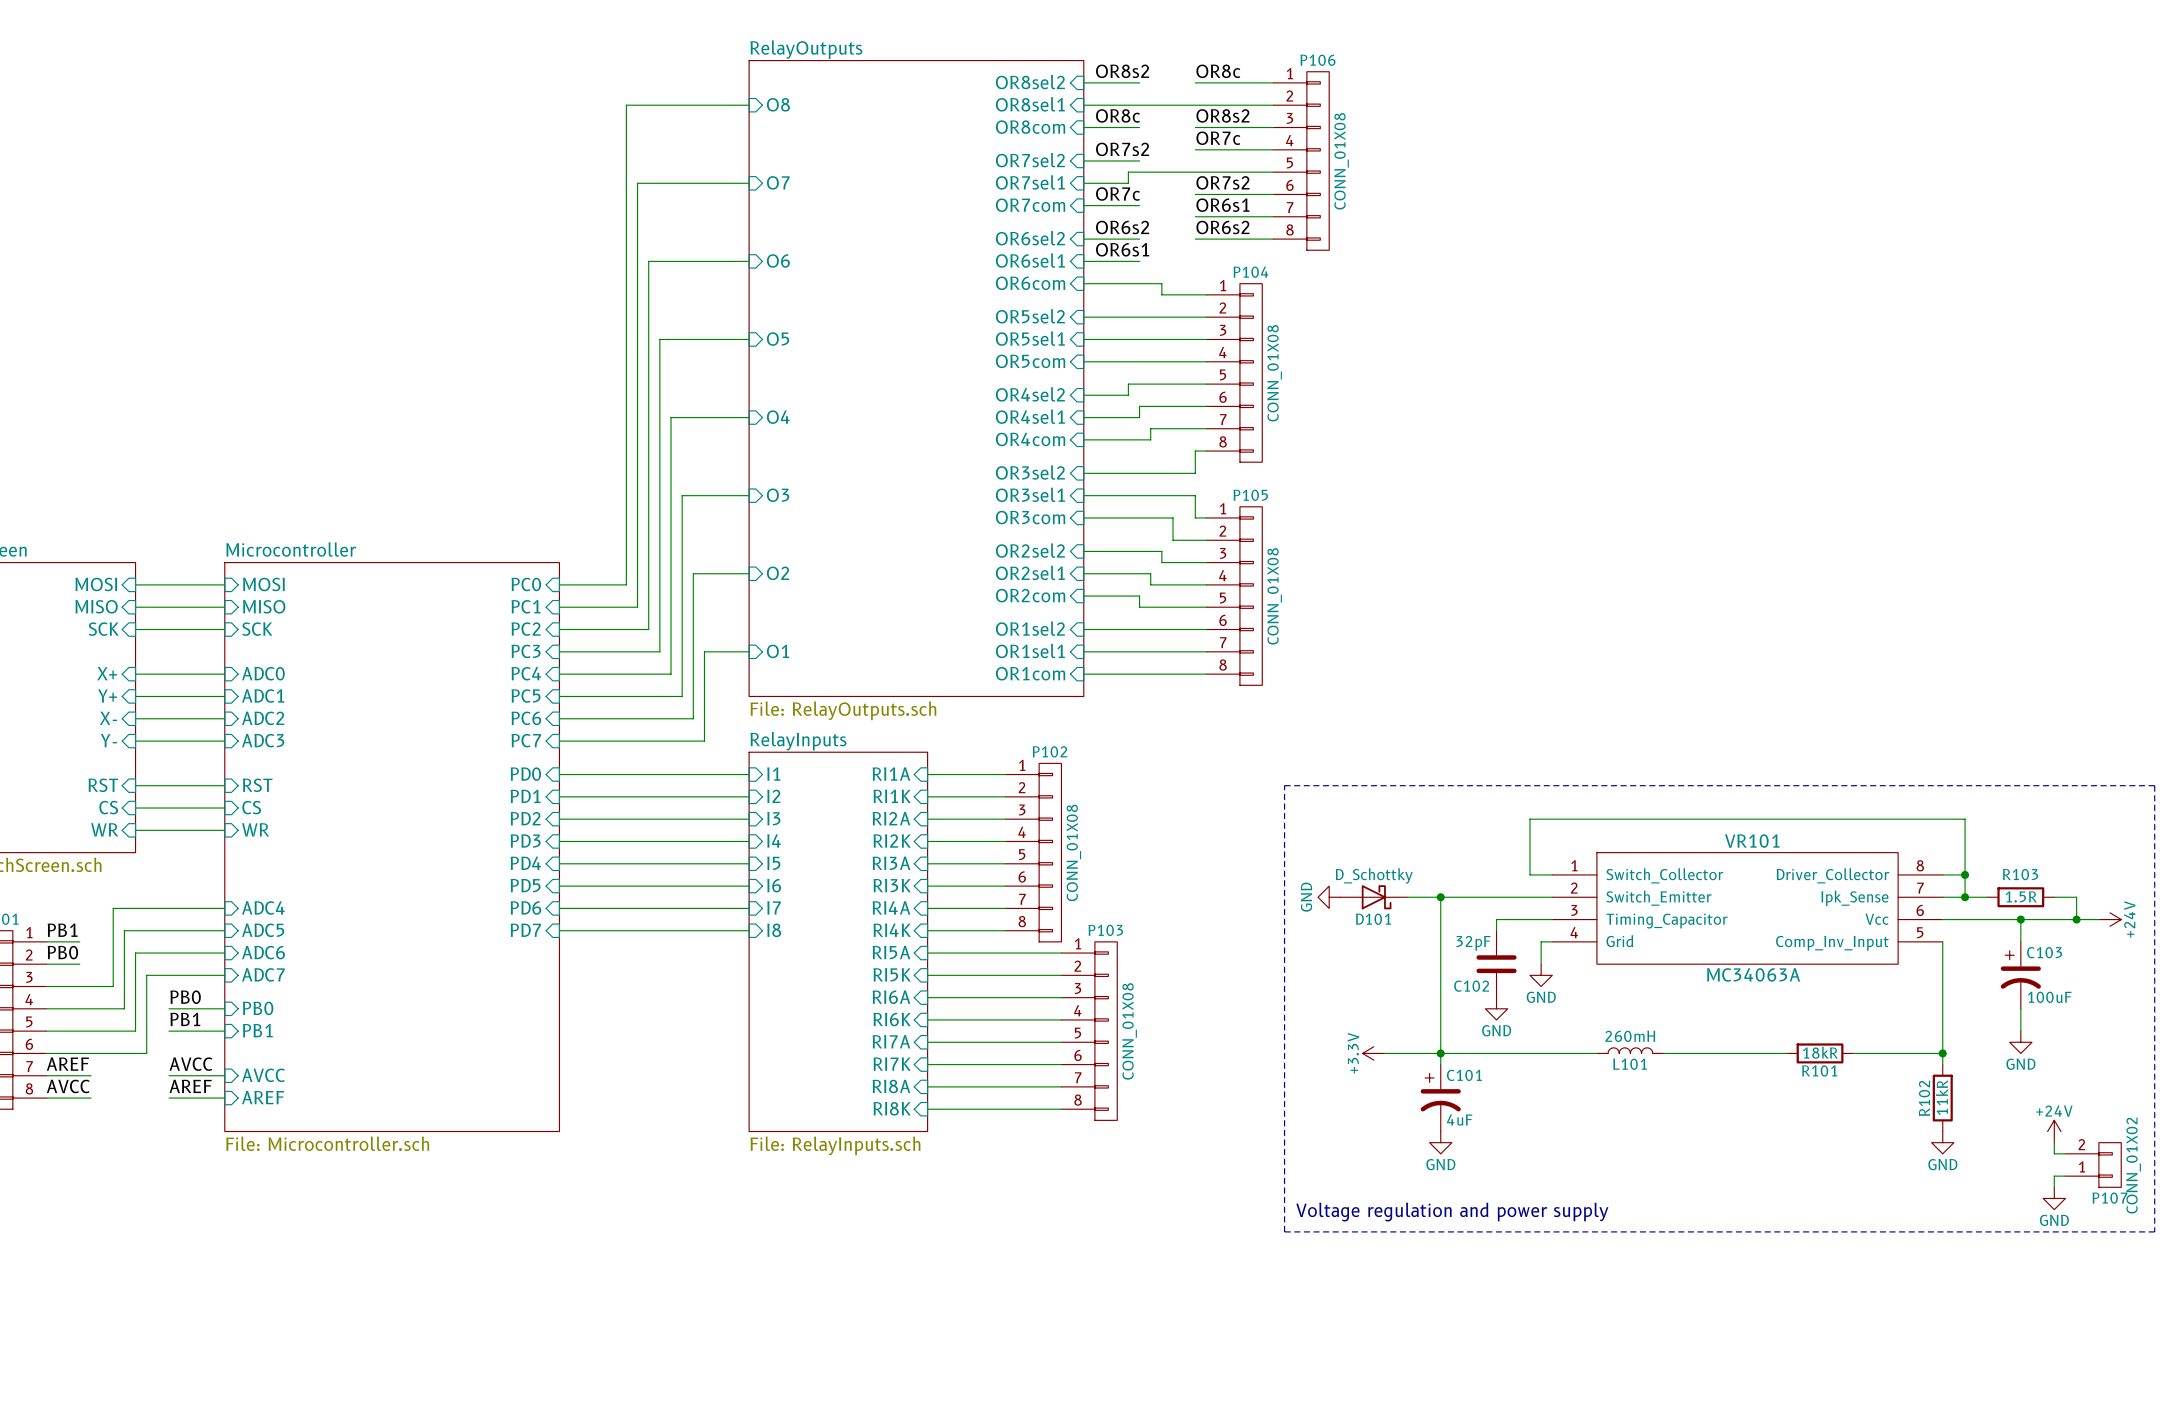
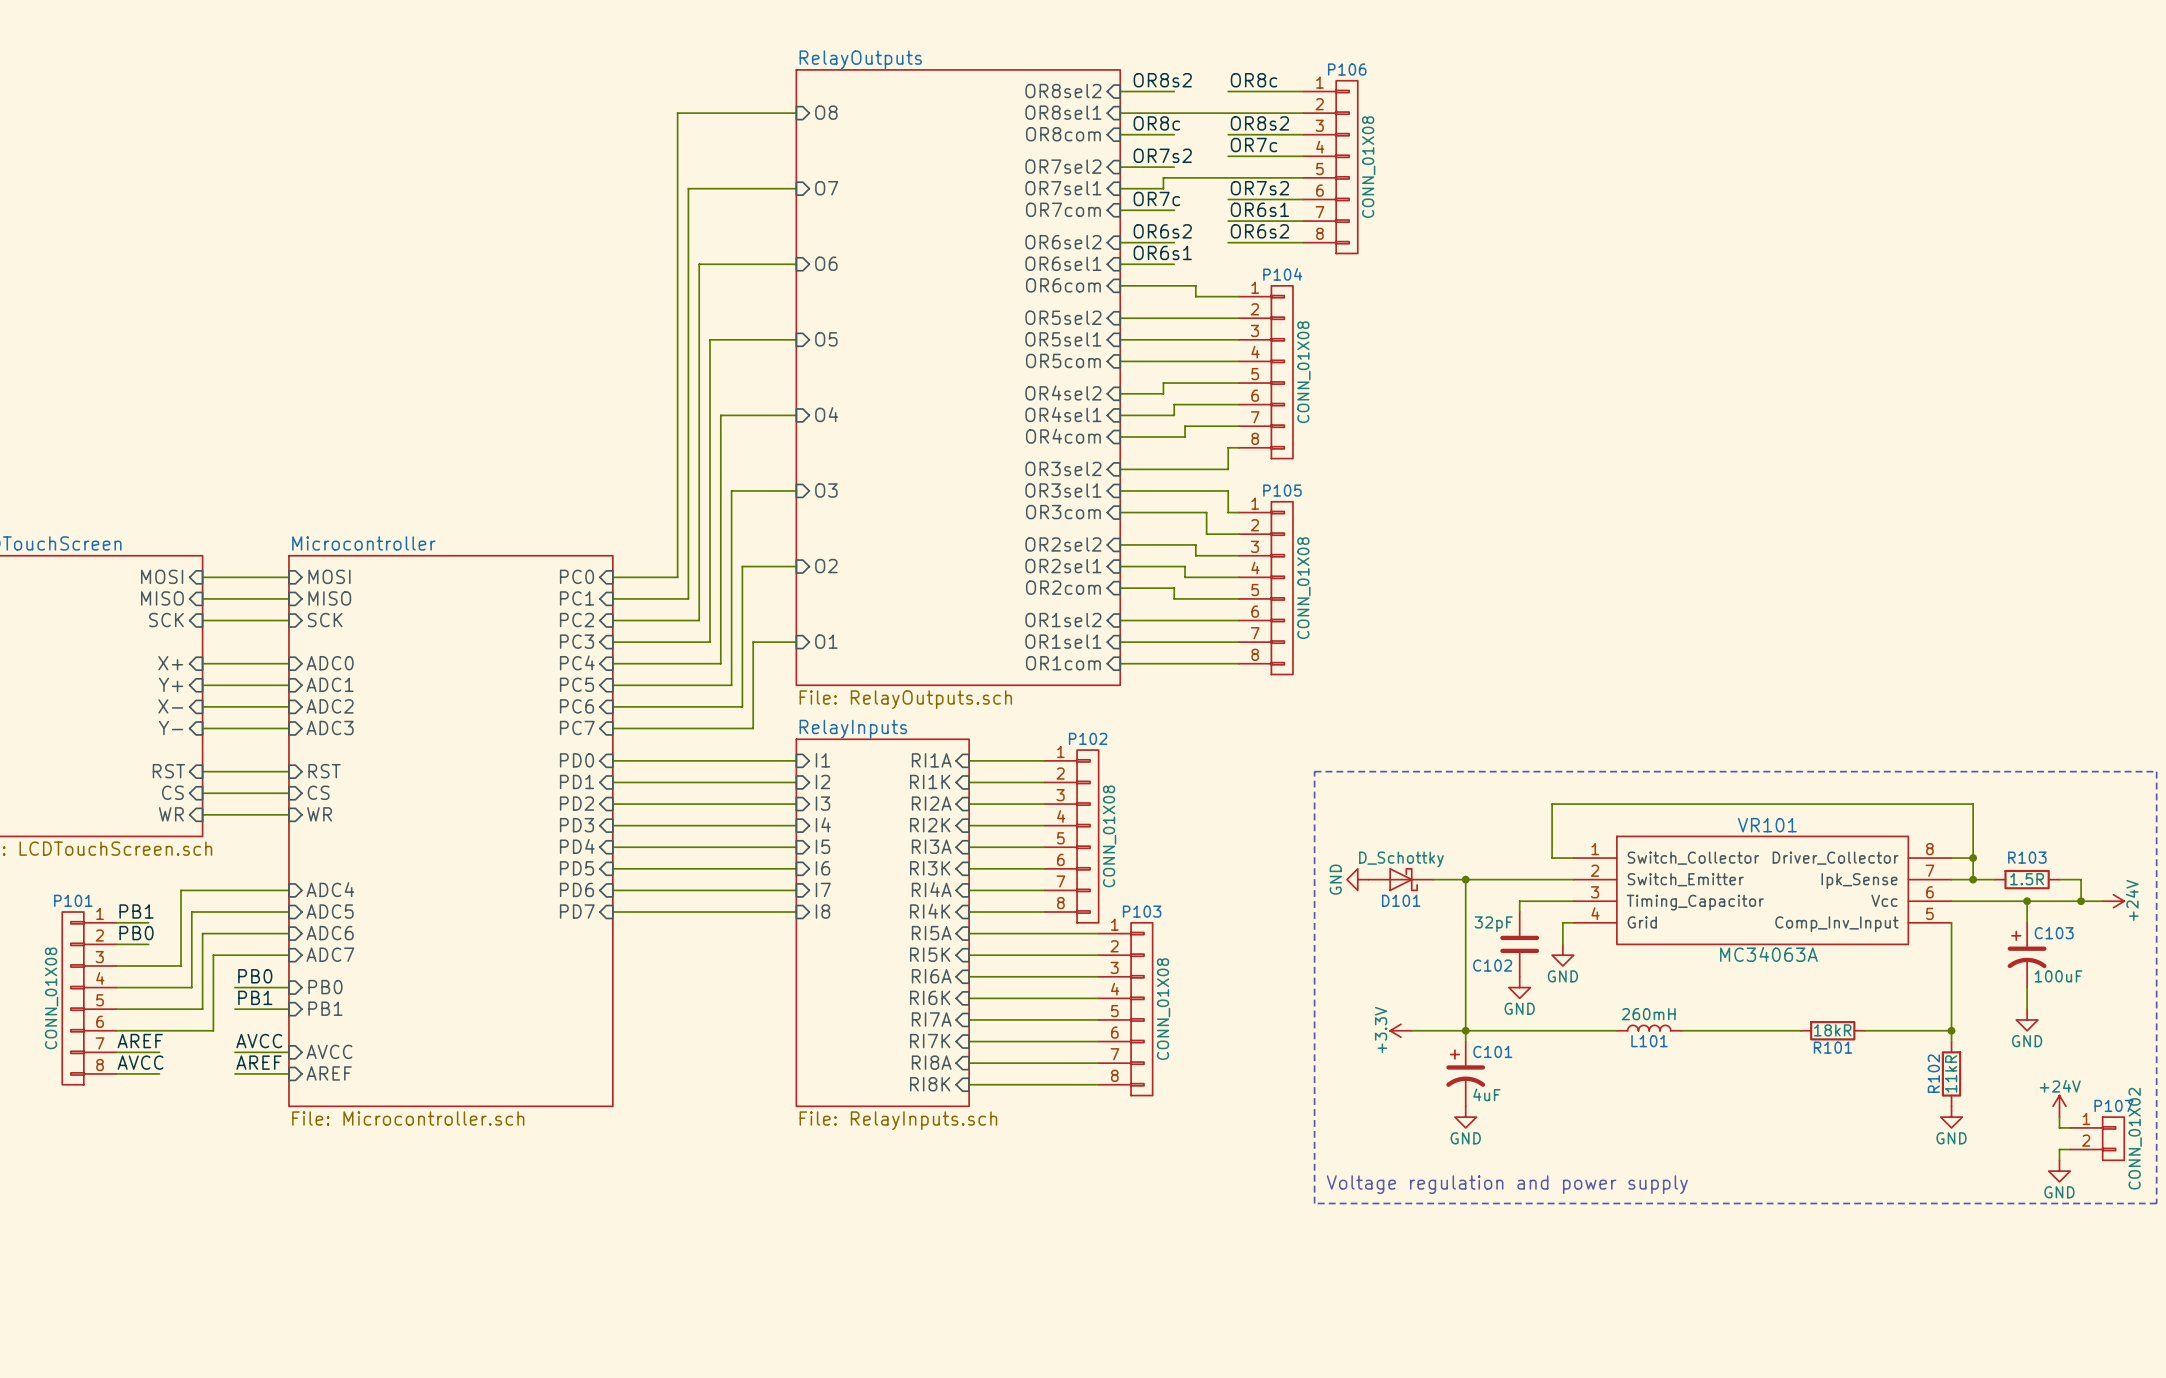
P107 flip: as is (2110, 1164) -> up-down (2113, 1138)

